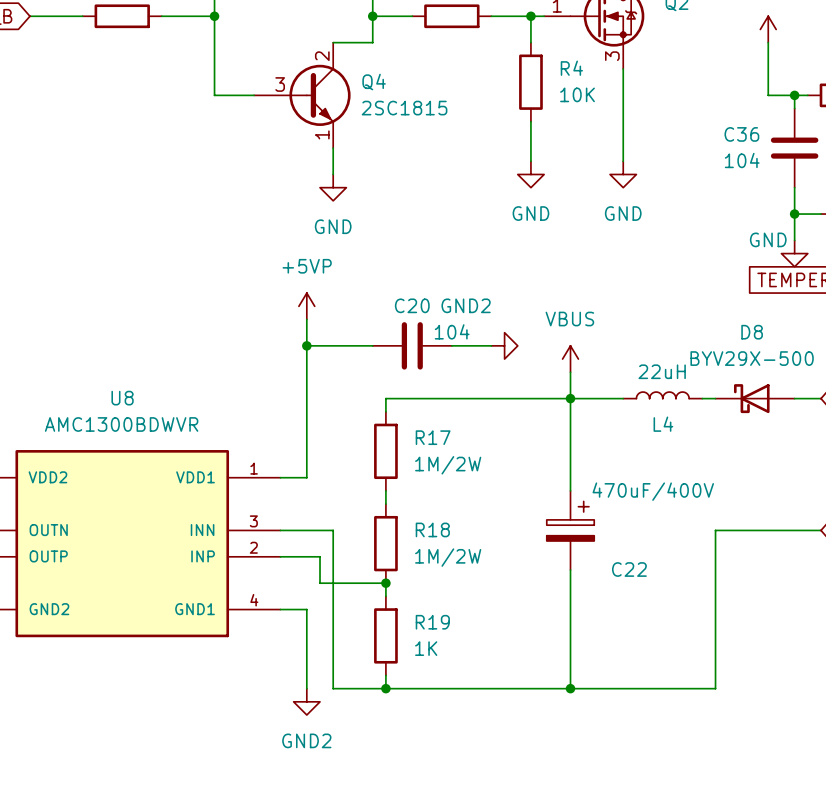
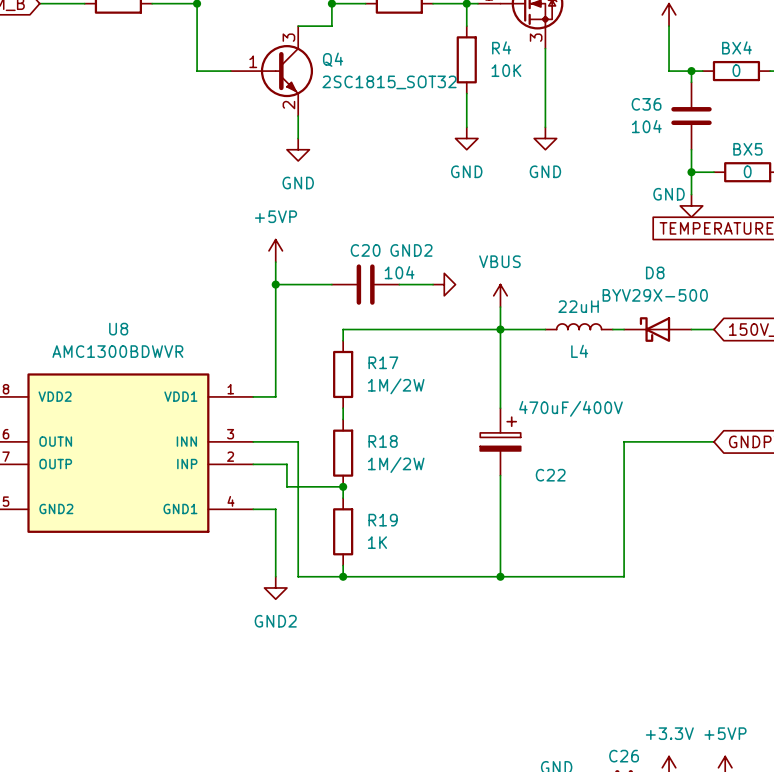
Q4 pin number: 2 (322, 56) -> 3 (288, 37)
Q4 pin number: 3 (280, 84) -> 1 (253, 61)
Q4 value: 2SC1815 (404, 108) -> 2SC1815_SOT32 (389, 82)
Q4 pin number: 1 (322, 134) -> 2 (288, 105)

